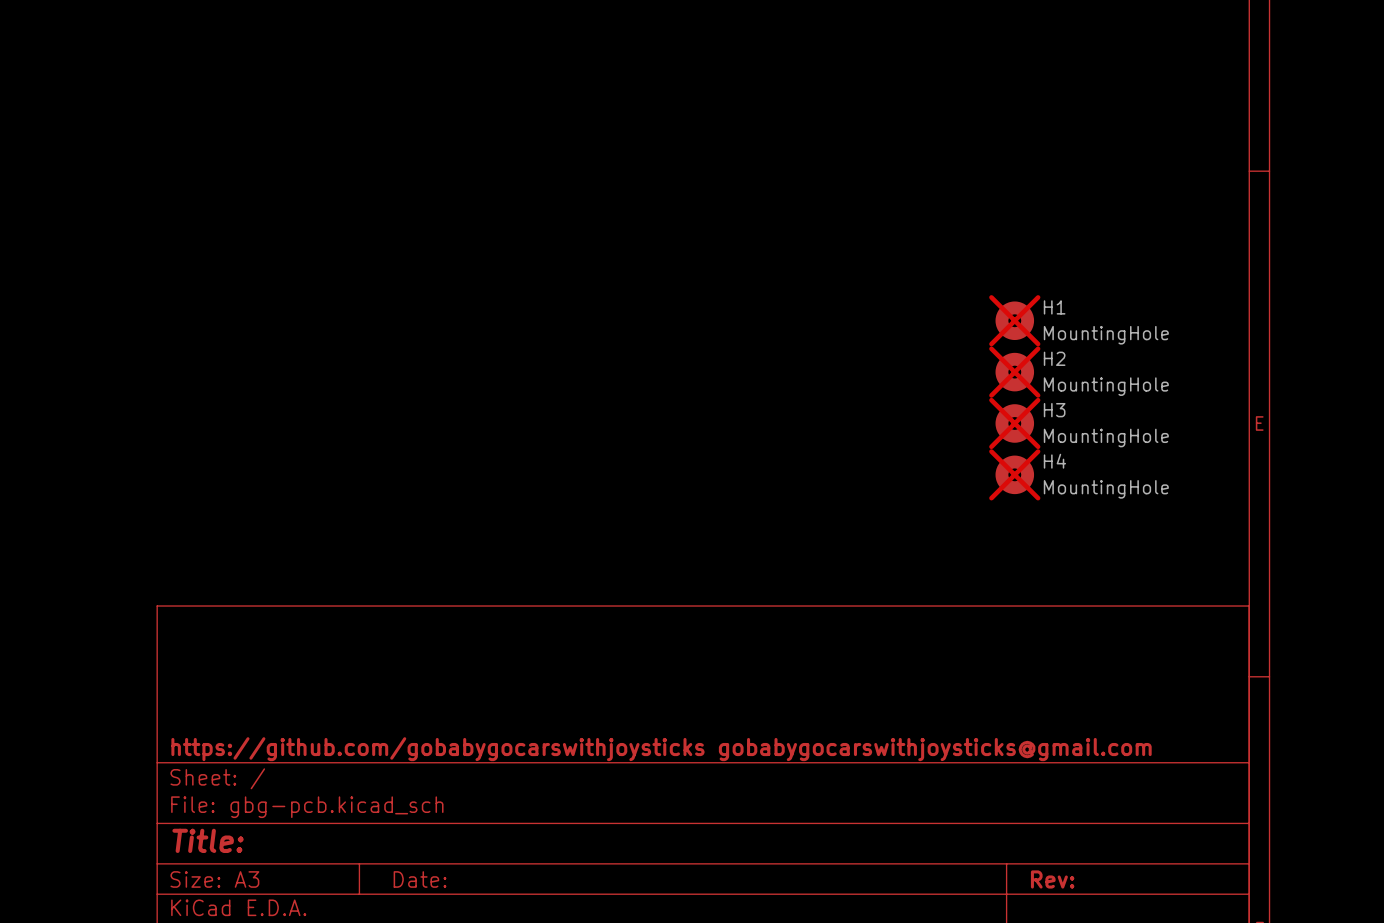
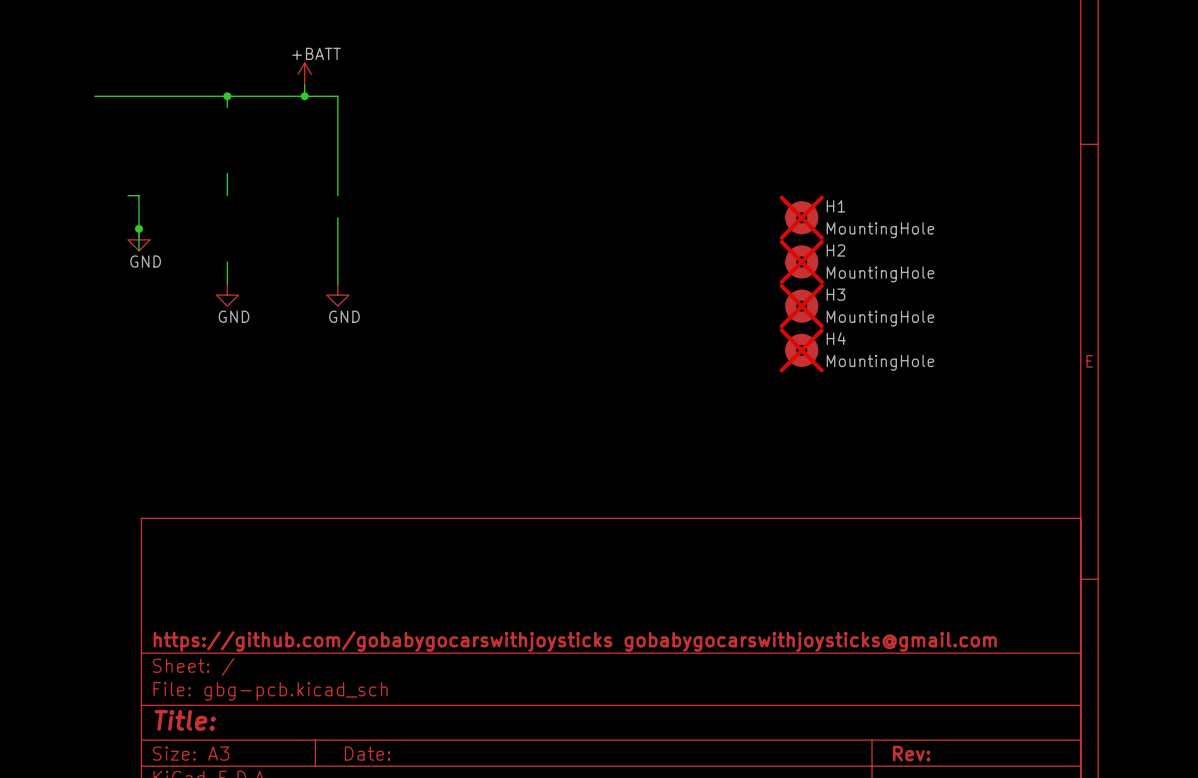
power symbol: none -> +BATT (304, 74)
wire: none -> (304, 85) (304, 96)
wire: none -> (94, 96) (337, 96) (337, 195)
wire: none -> (227, 96) (227, 107)
junction: none -> (227, 96)
junction: none -> (304, 96)
wire: none -> (227, 173) (227, 195)
wire: none -> (127, 195) (139, 195) (139, 250)
wire: none -> (337, 217) (337, 284)
junction: none -> (139, 228)
power symbol: none -> GND (139, 239)
wire: none -> (227, 261) (227, 284)
H1 position: (1014, 320) -> (801, 217)
power symbol: none -> GND (227, 295)
power symbol: none -> GND (337, 295)
H2 position: (1014, 372) -> (801, 261)
H3 position: (1014, 423) -> (801, 306)
H4 position: (1014, 474) -> (801, 350)

